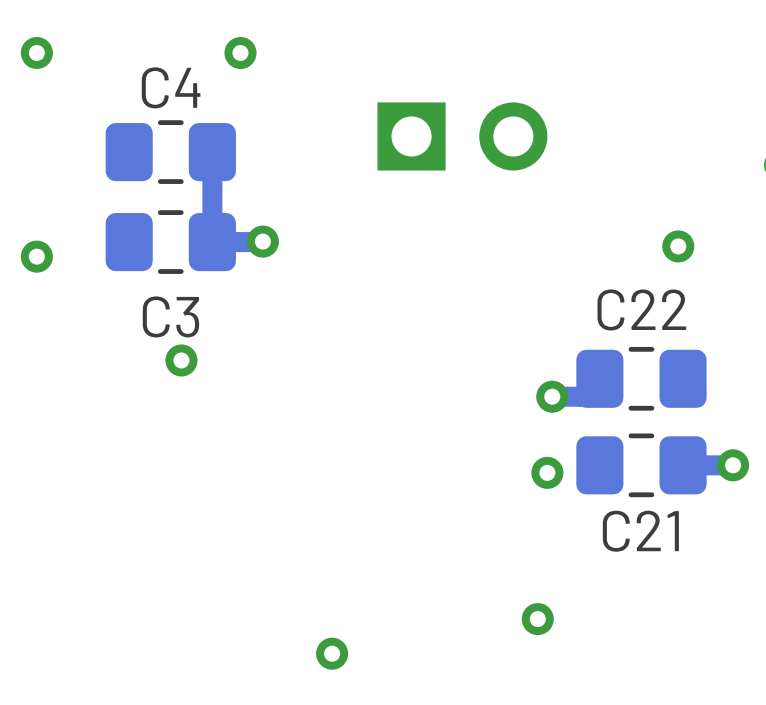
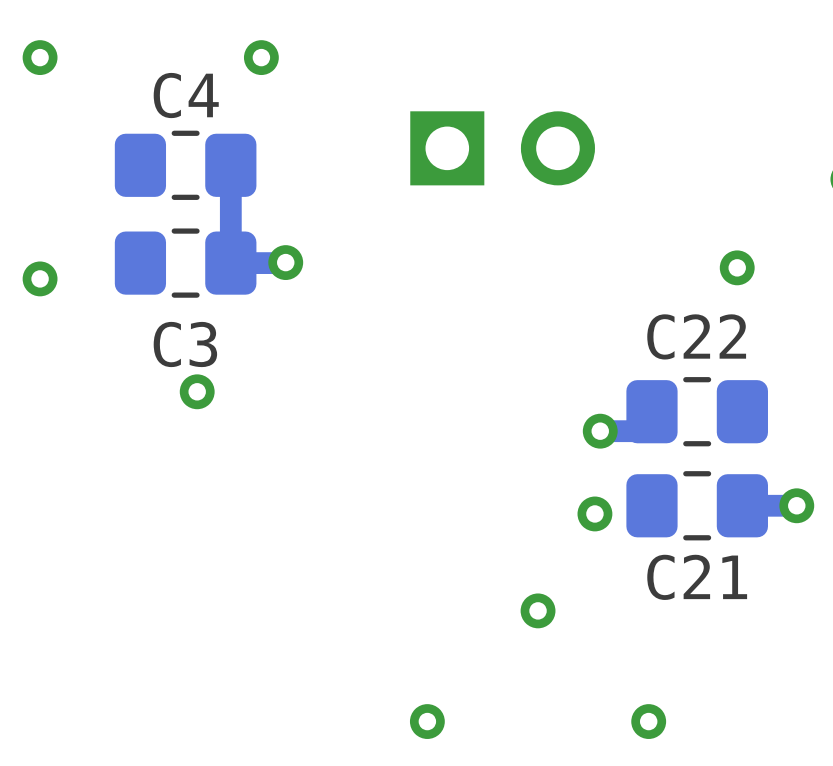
via: none -> (538, 610)
via: (537, 619) -> none
via: (332, 653) -> none
via: none -> (427, 721)
via: none -> (648, 721)

